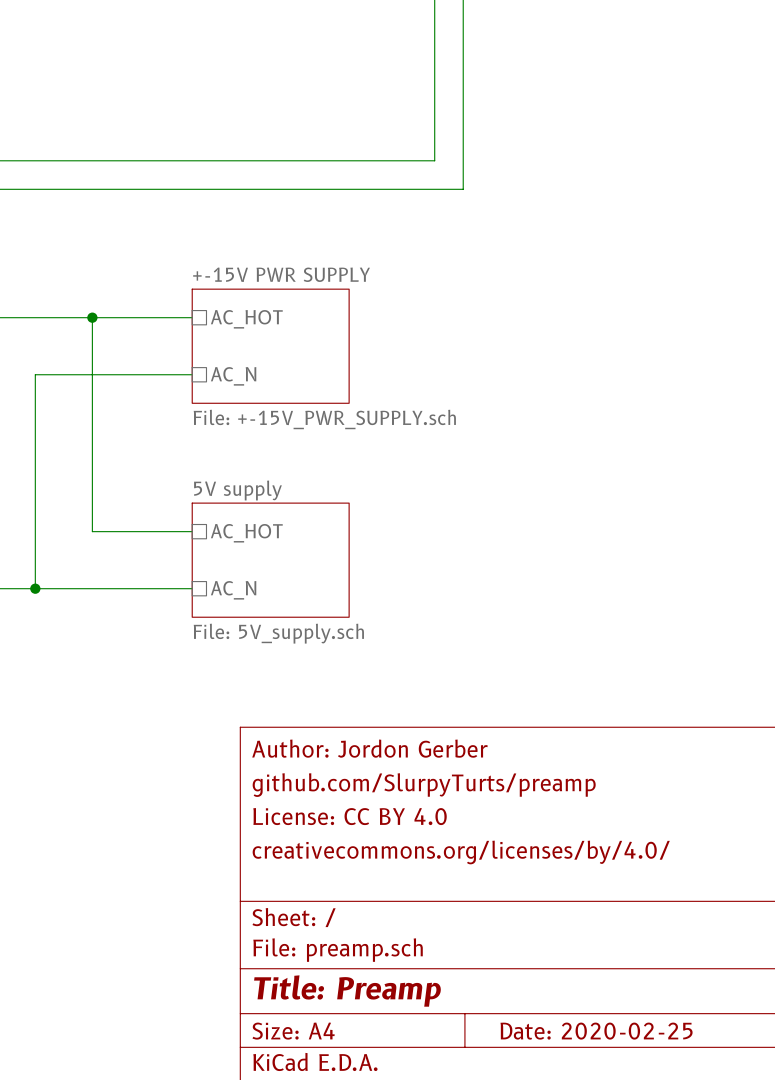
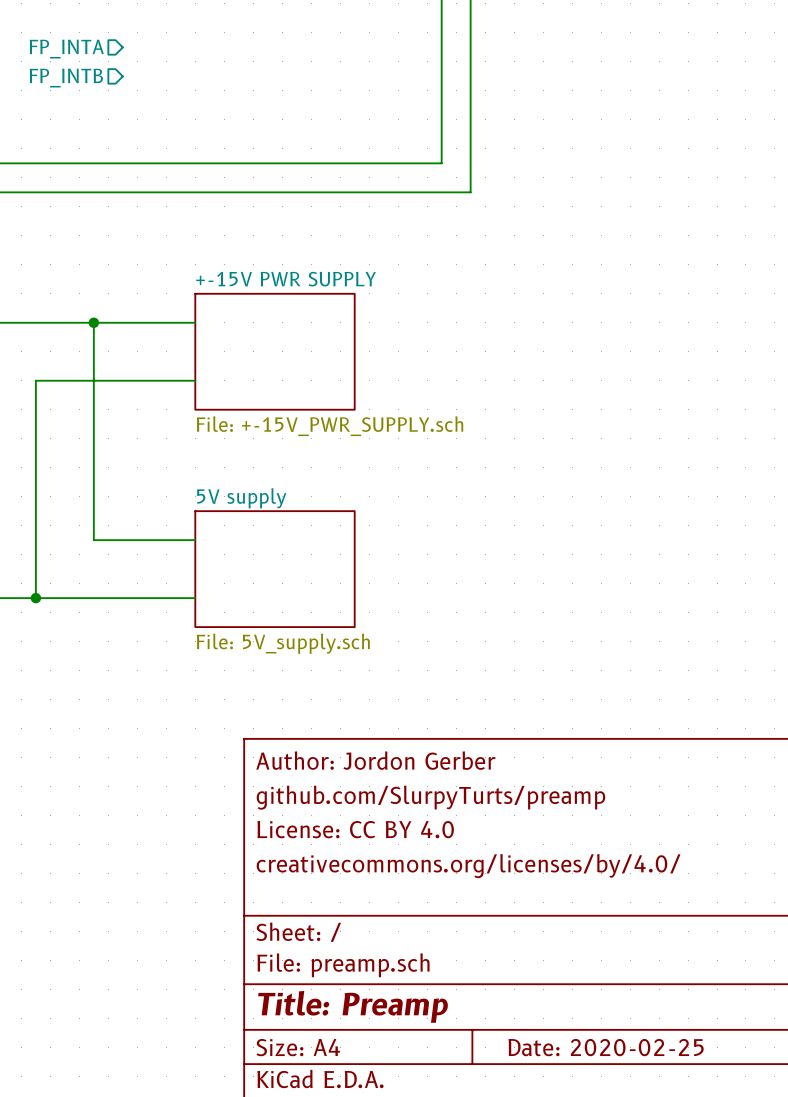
sheet pin: none -> FP_INTA (66, 49)
sheet pin: none -> FP_INTB (66, 78)
sheet pin: AC_HOT (246, 319) -> none
sheet pin: AC_N (233, 376) -> none
sheet pin: AC_HOT (246, 533) -> none
sheet pin: AC_N (233, 590) -> none

